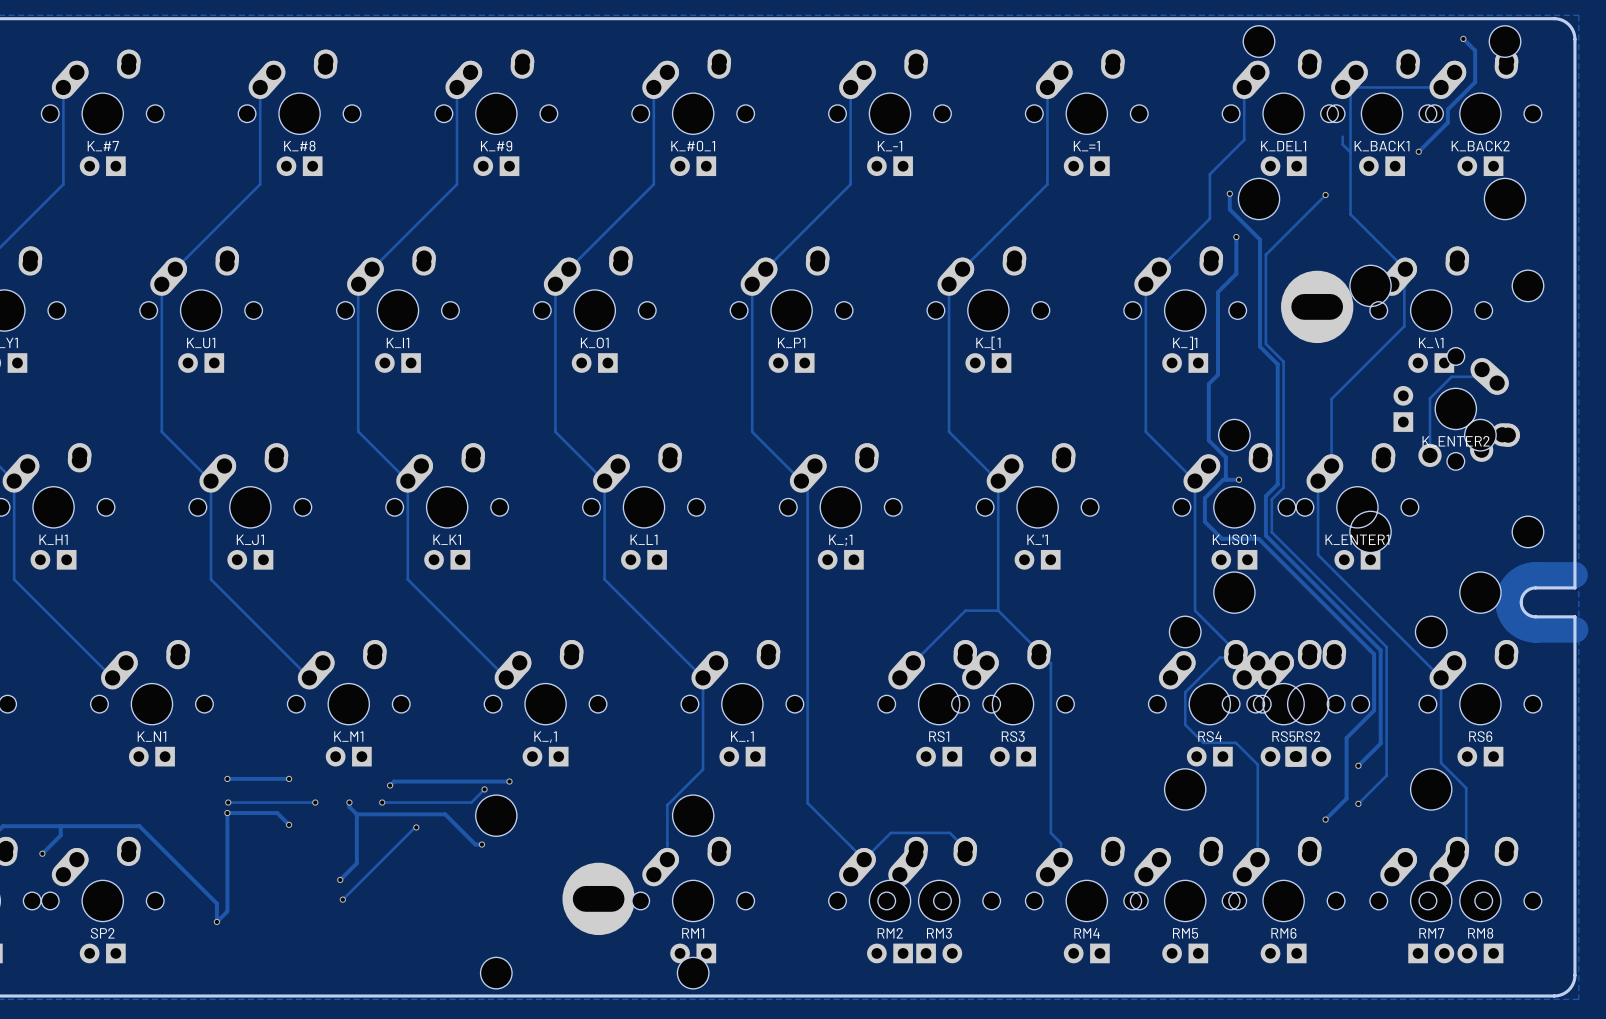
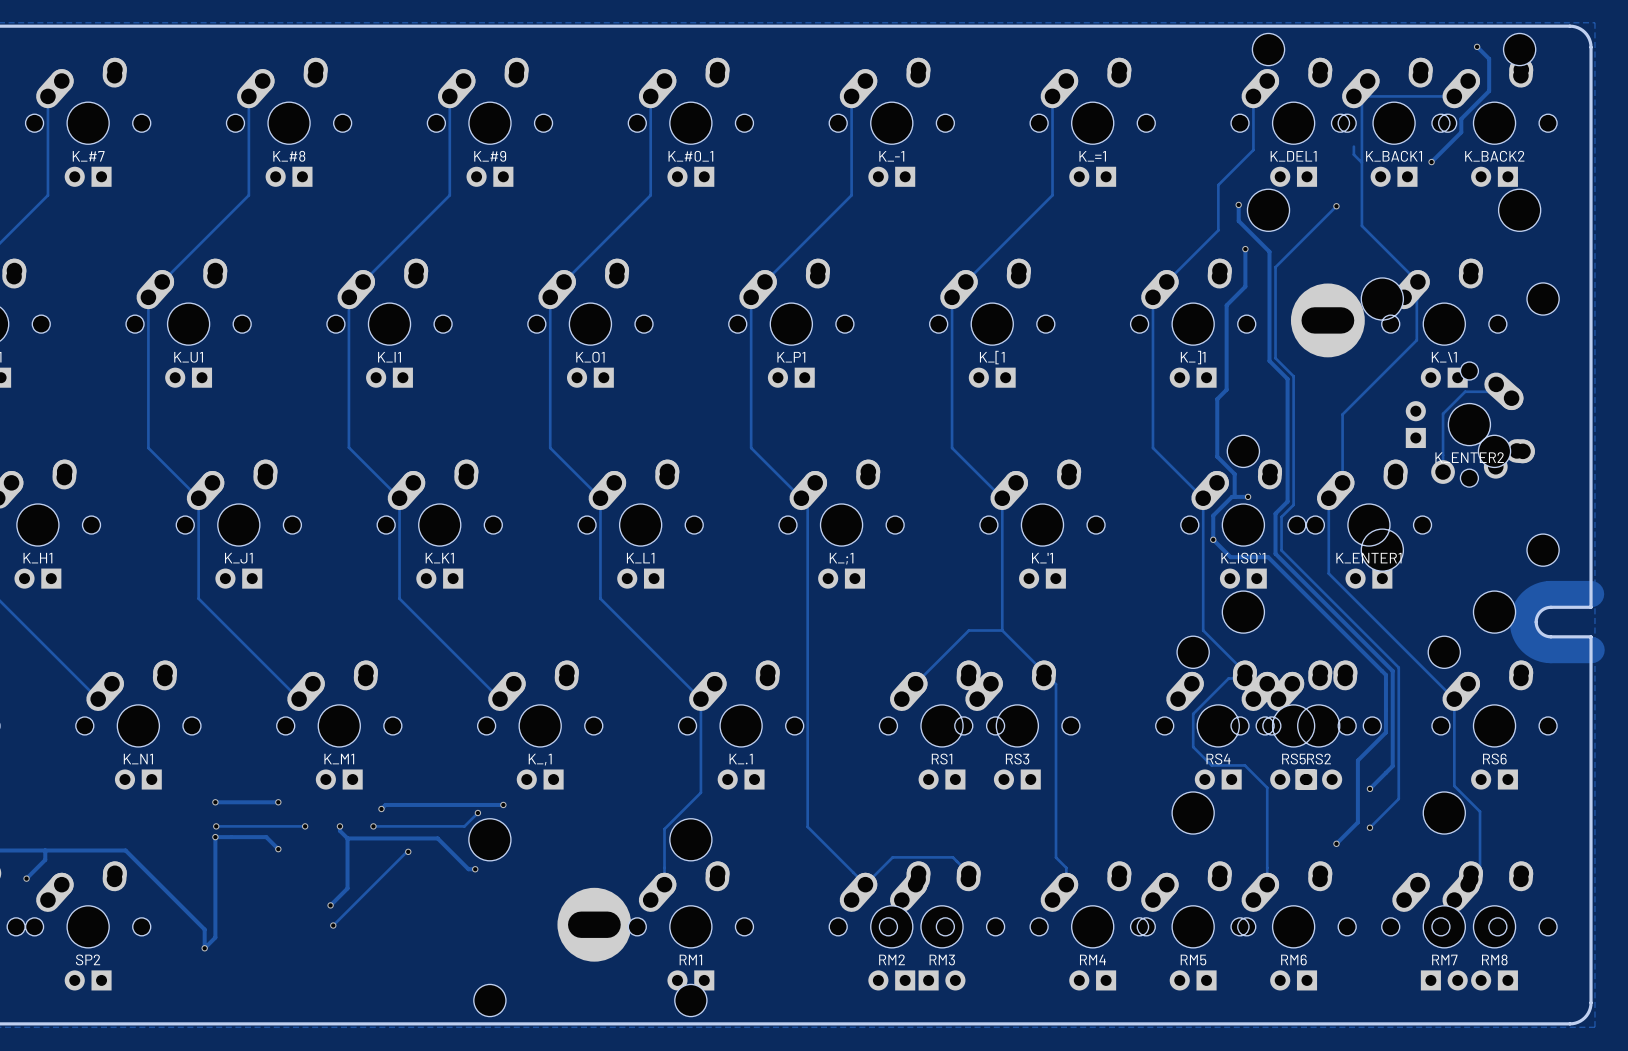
via: none -> (1213, 539)

